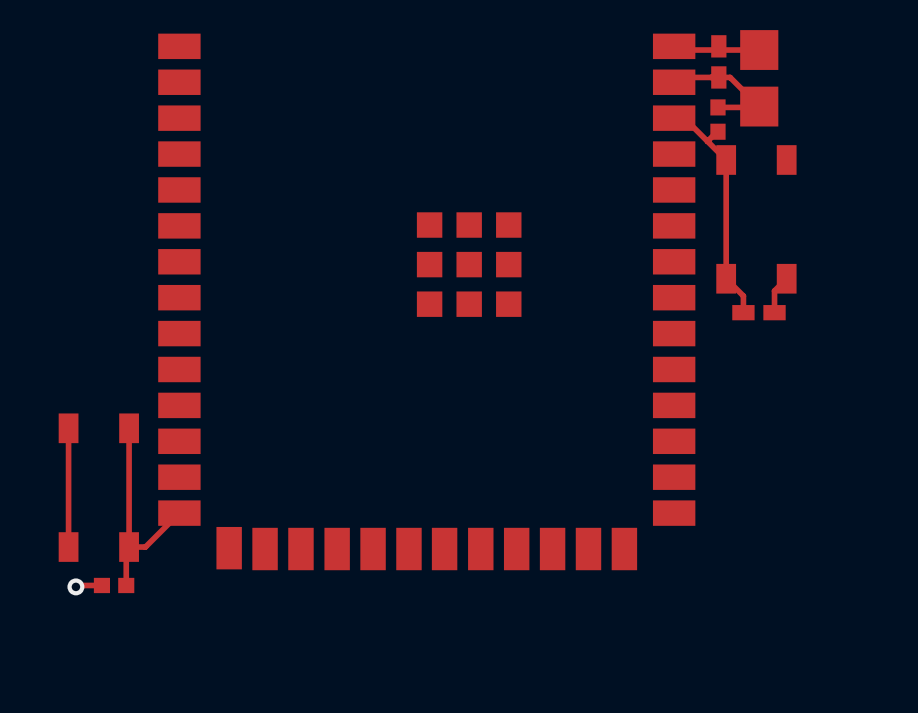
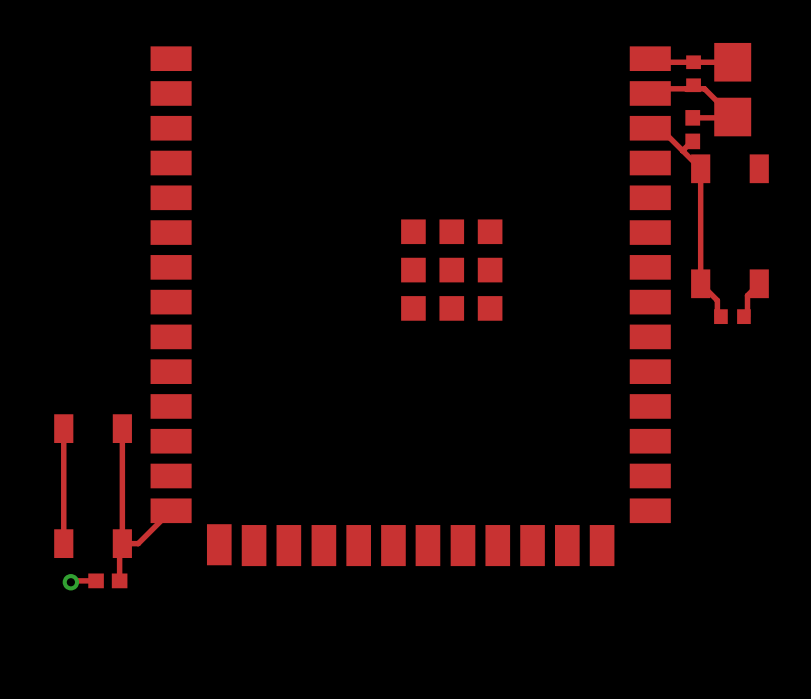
part footprint: [711, 35, 727, 89] -> [686, 55, 701, 93]
part footprint: [732, 305, 786, 321] -> [714, 309, 751, 325]

